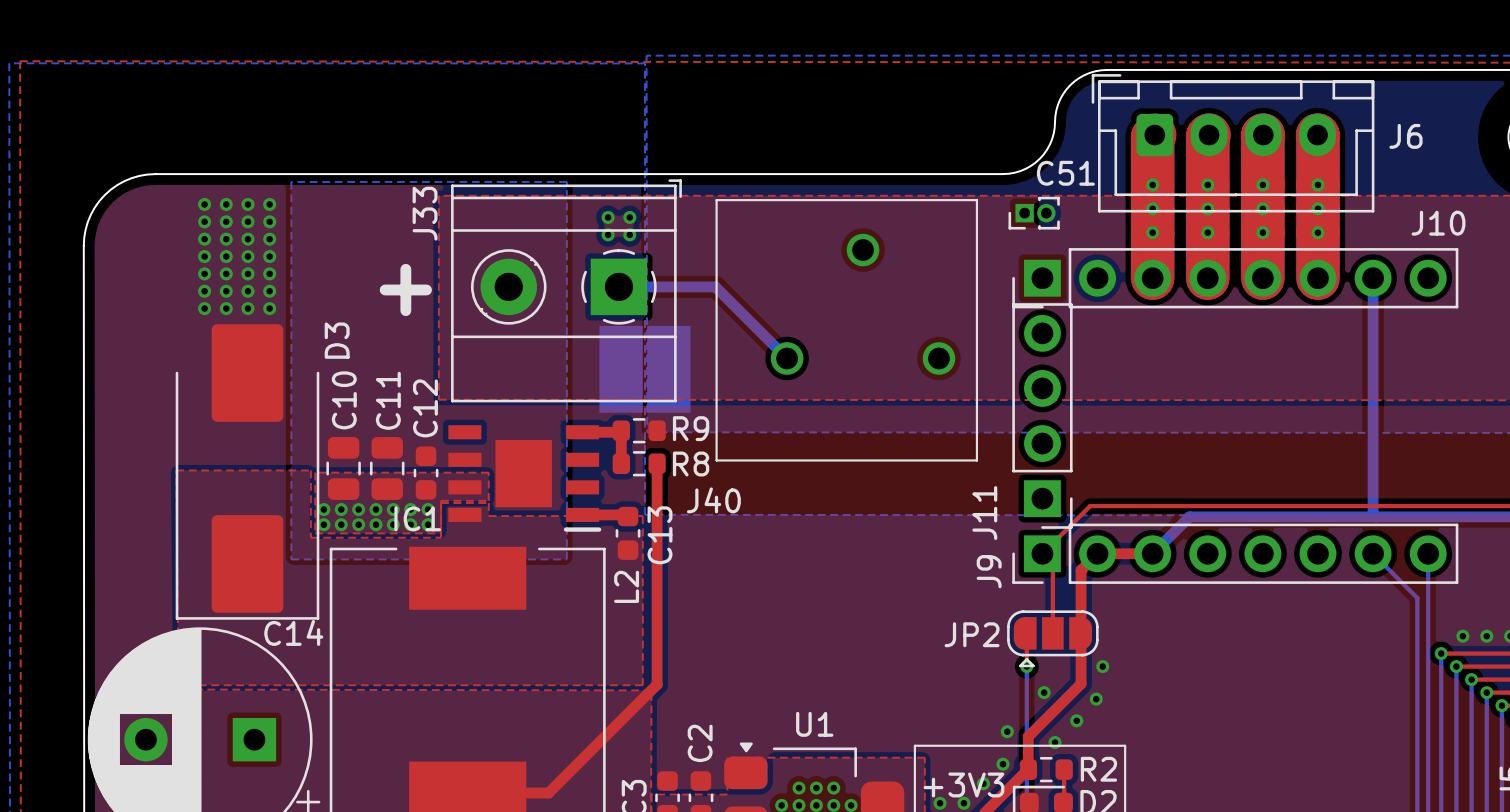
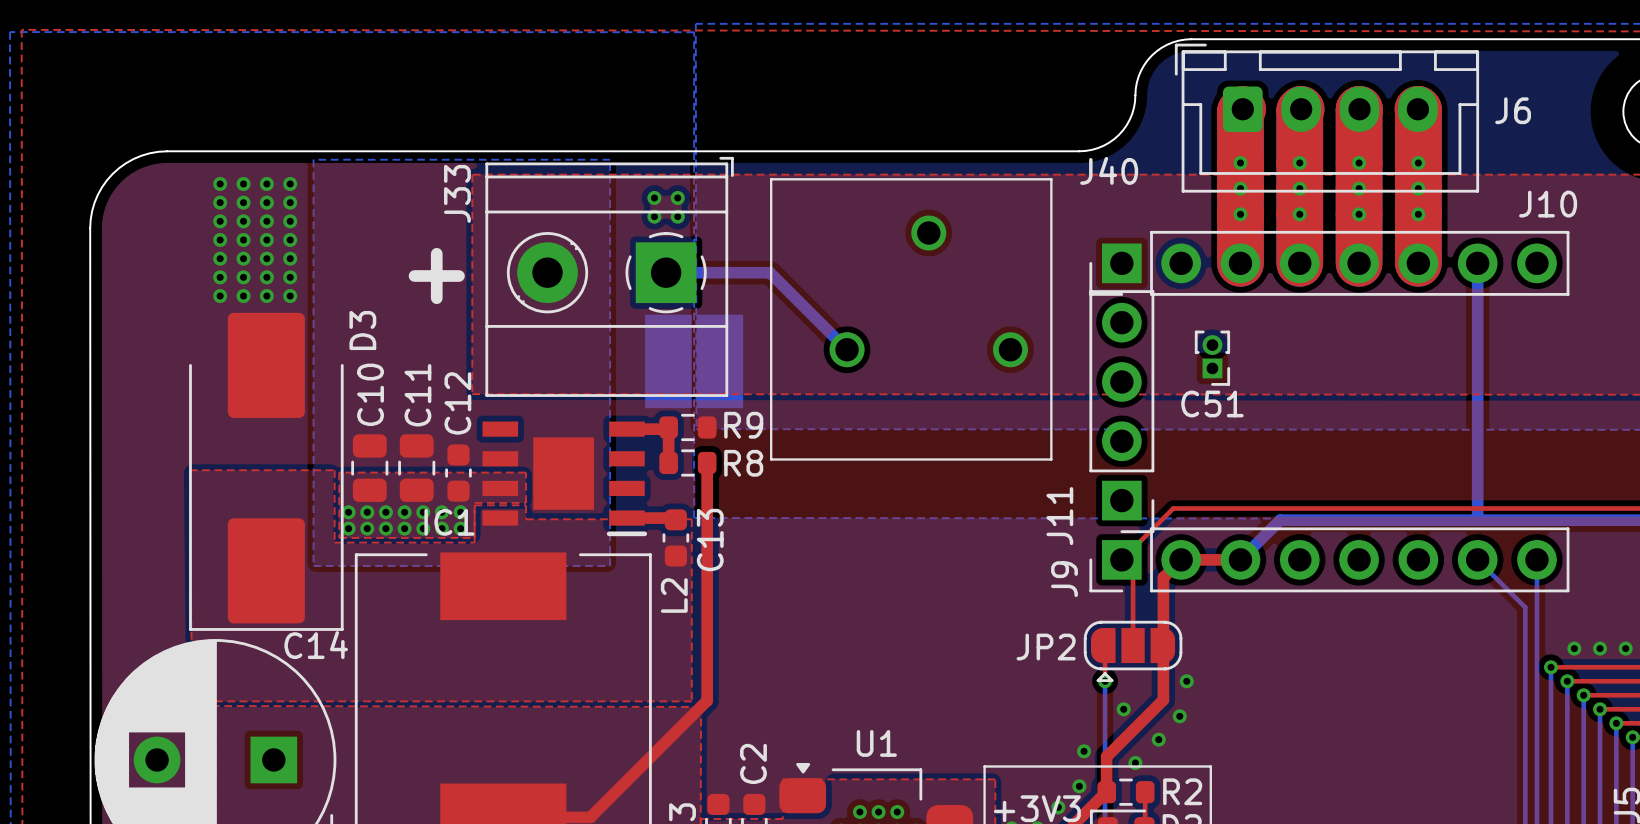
C51 name position: C51 (1065, 173) -> C51 (1212, 403)
C51 rotation: 0° (1034, 213) -> 90° counterclockwise (1212, 358)
C51 position: (1034, 213) -> (1212, 358)
J40 name position: J40 (713, 500) -> J40 (1109, 170)

